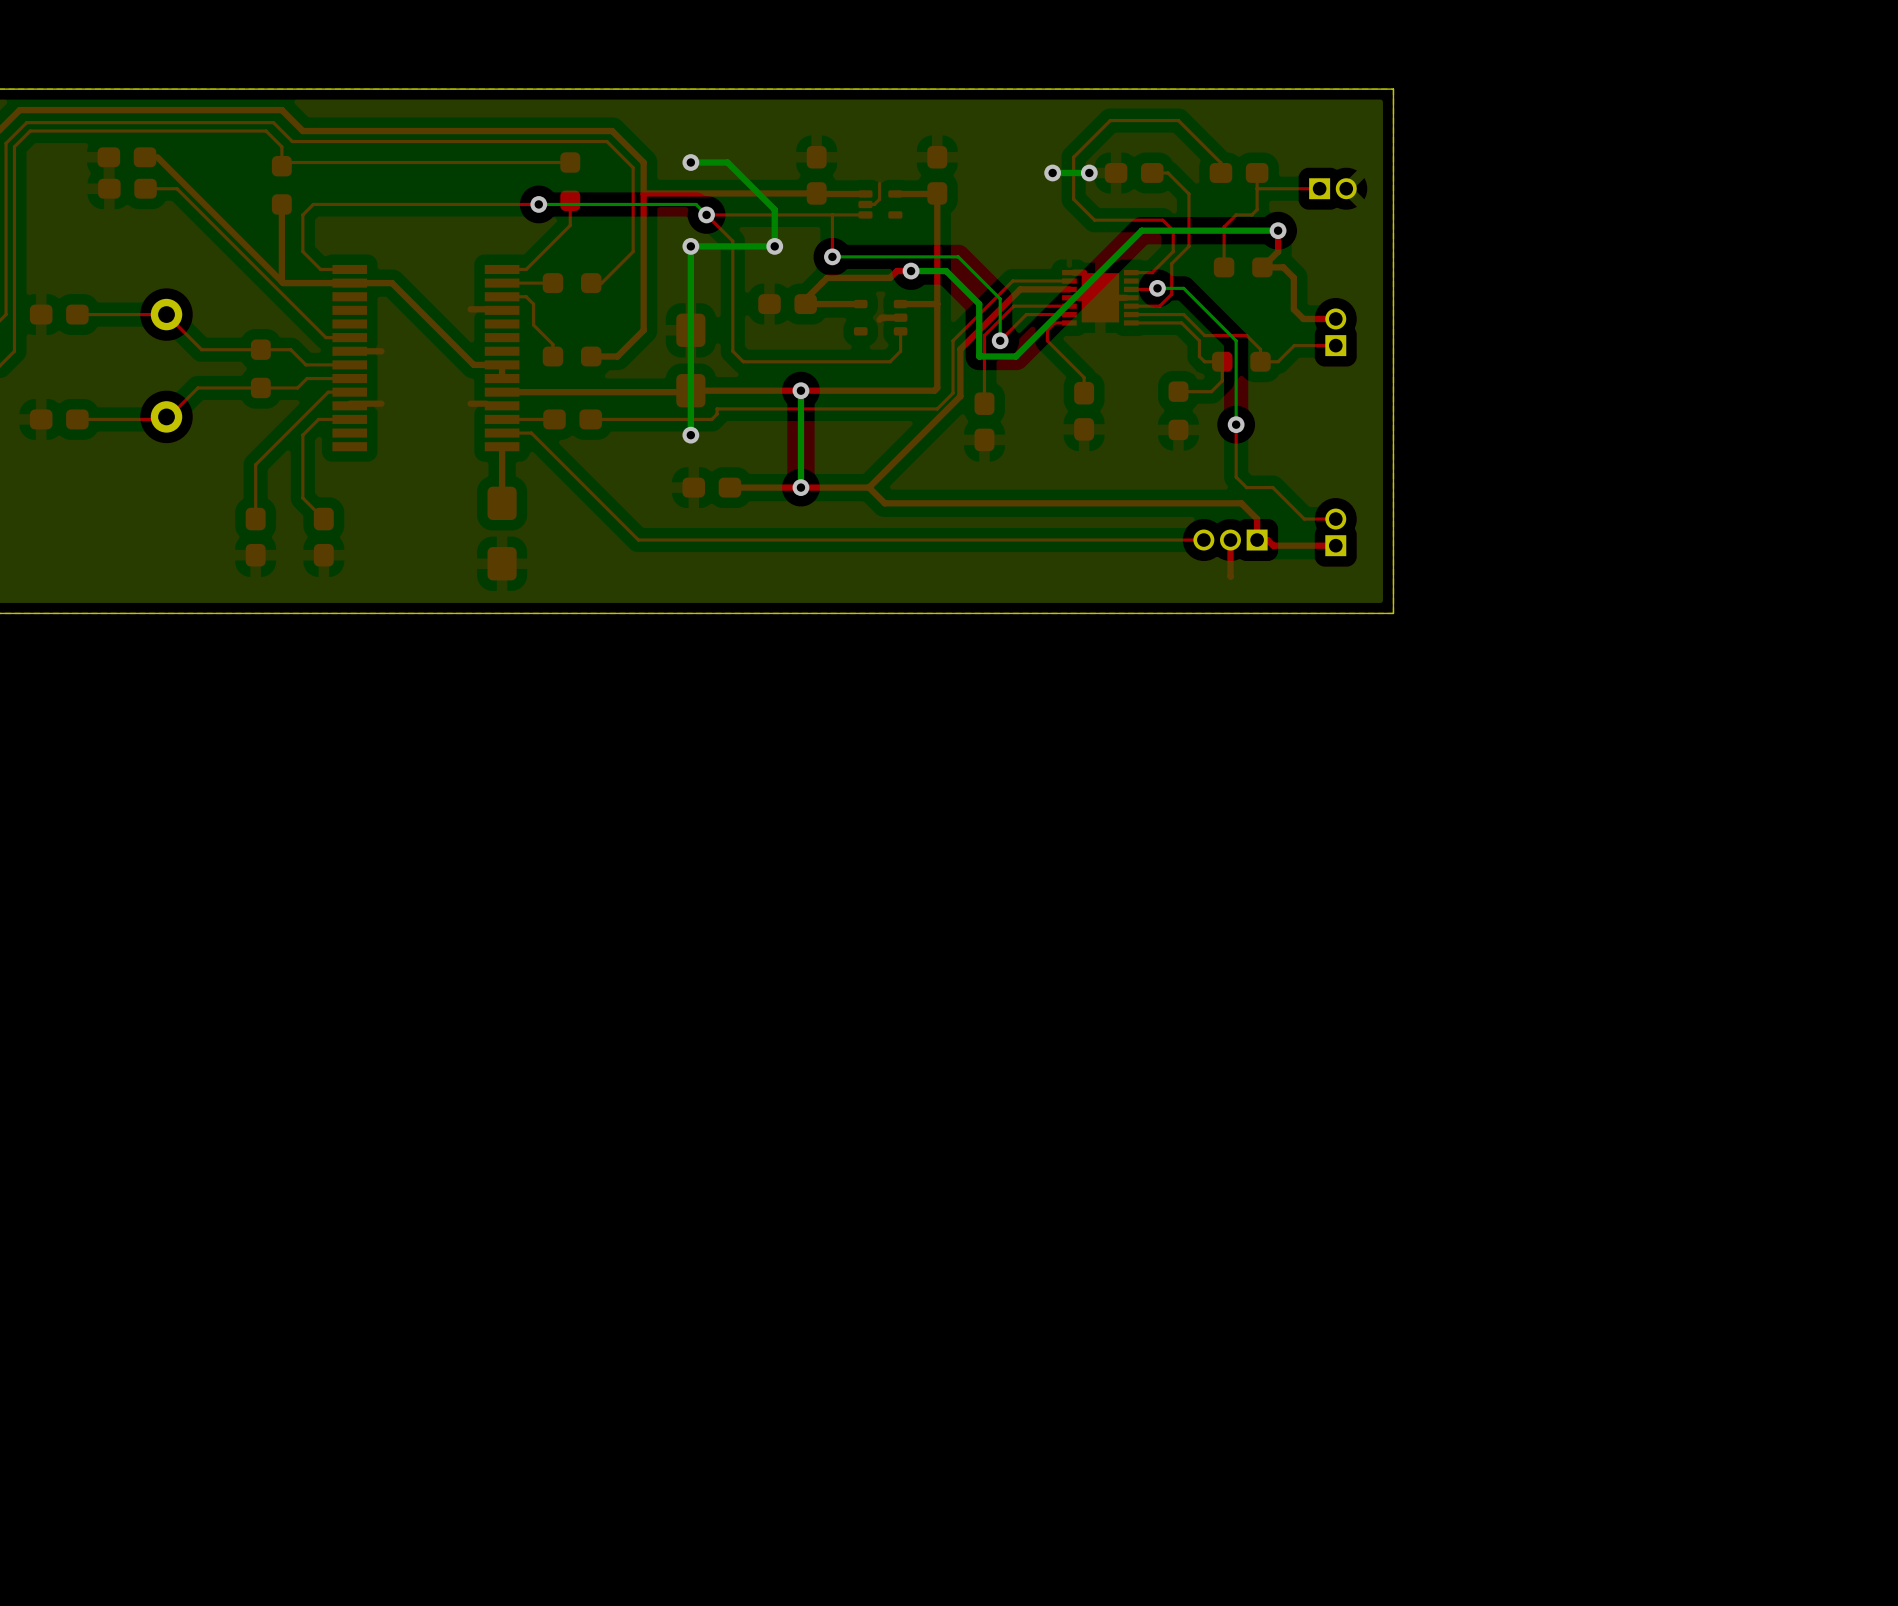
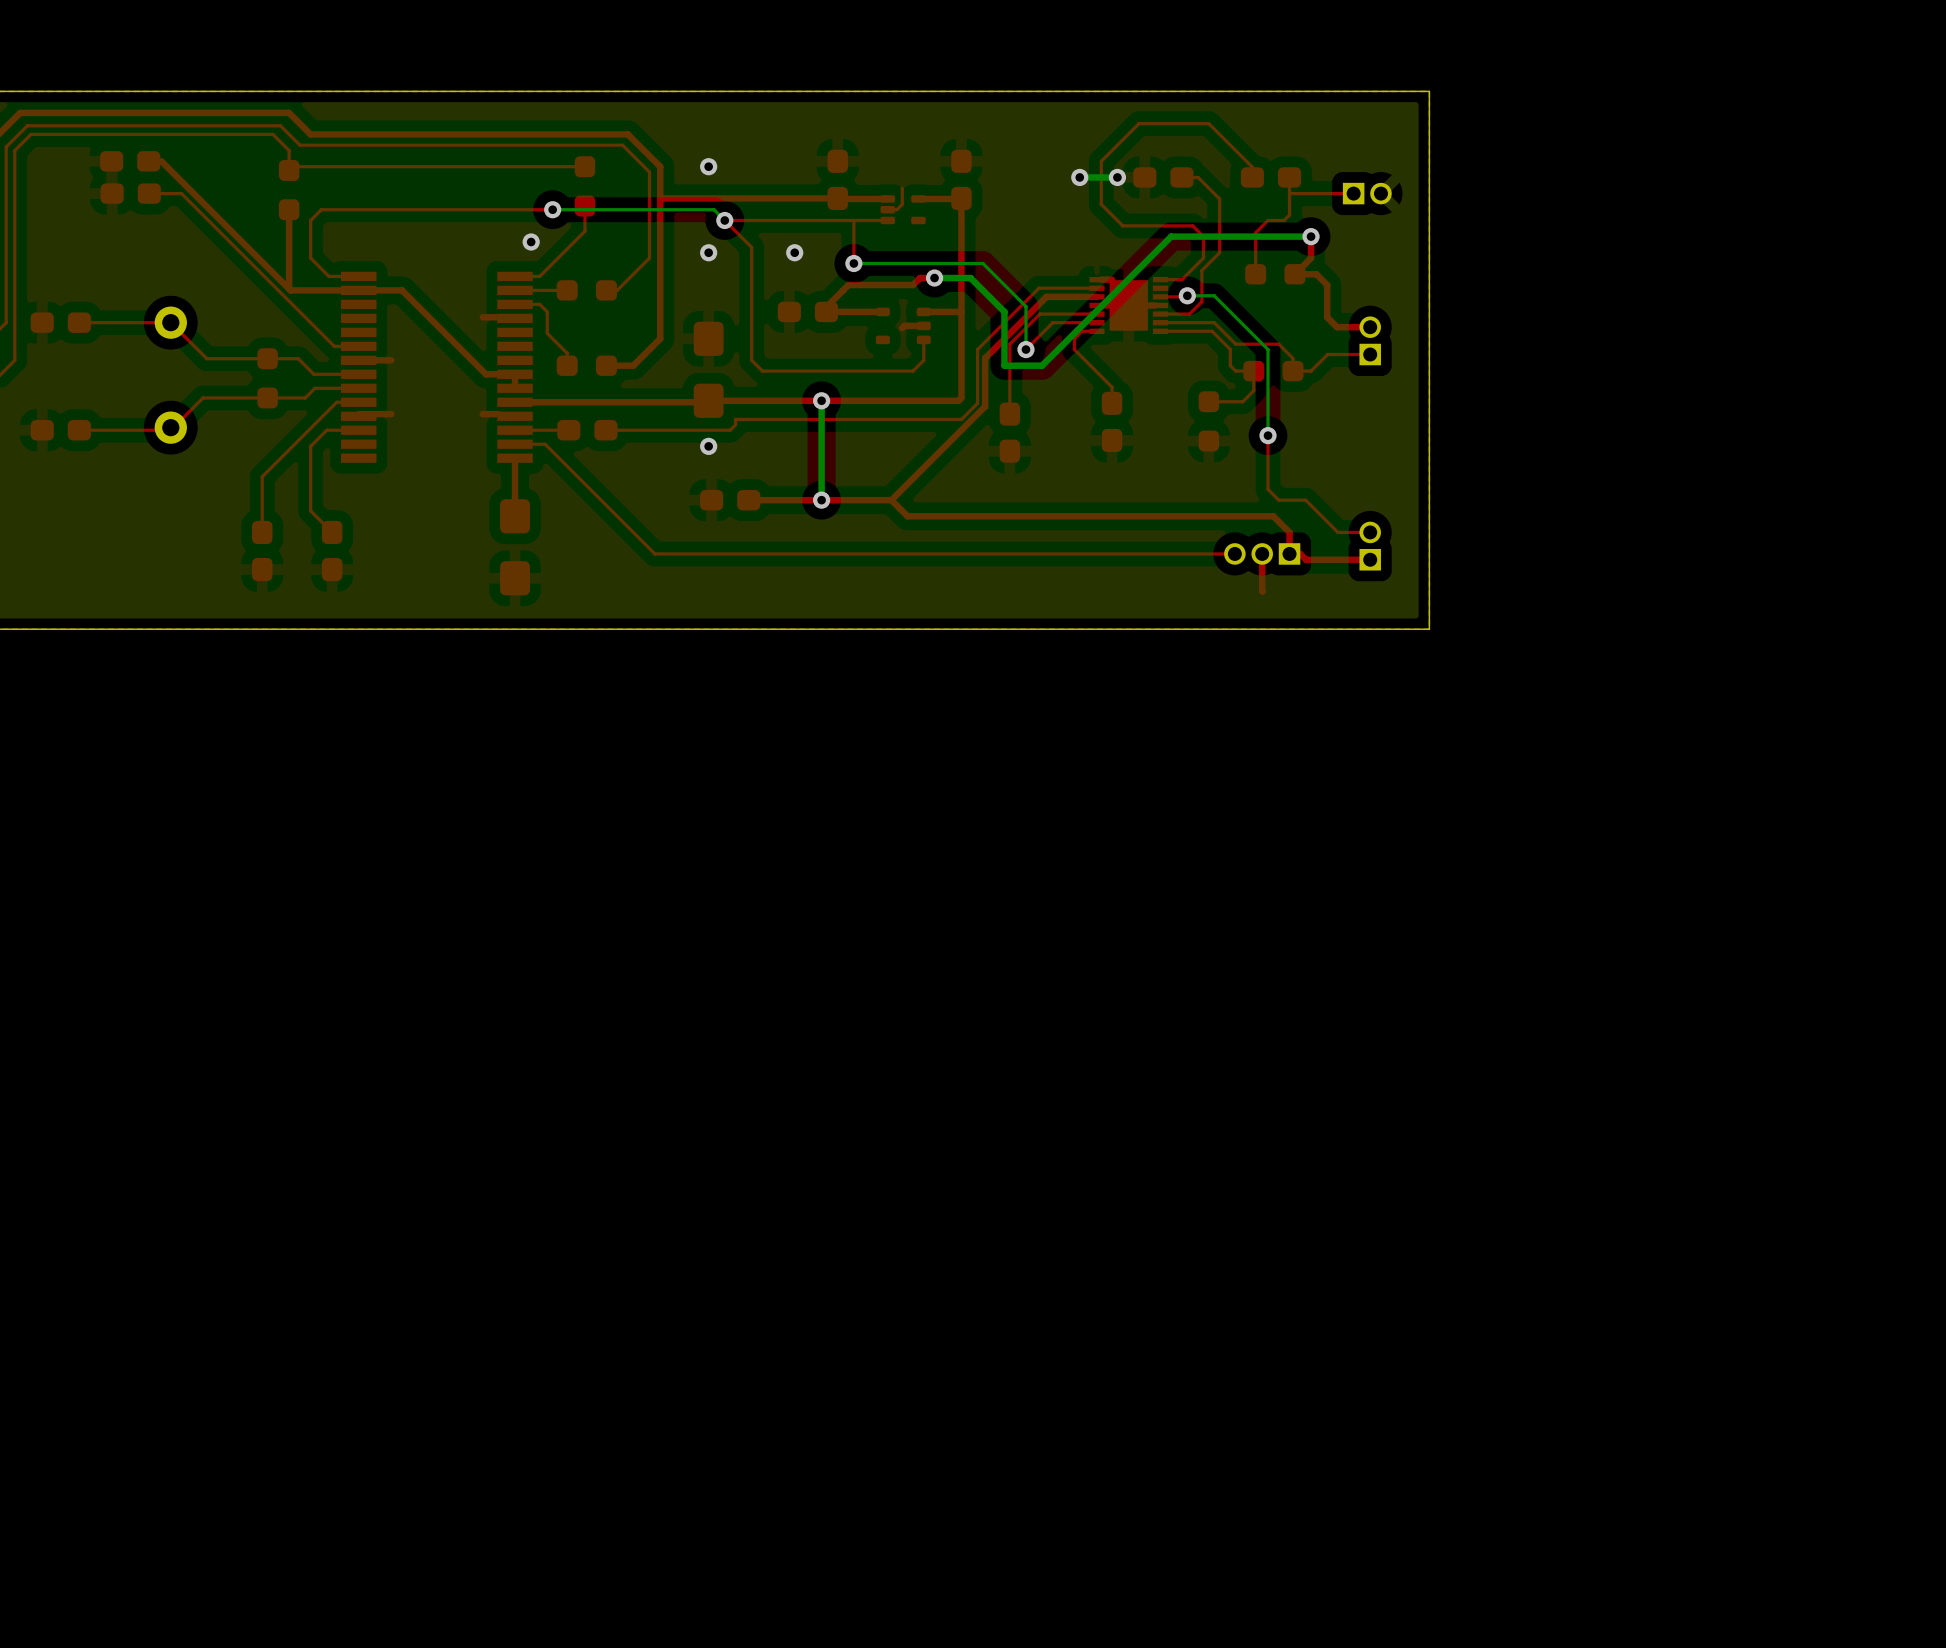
bottom track: (690, 162) (727, 162) (774, 209) (774, 246) (690, 246) (690, 435) -> none
via: none -> (531, 241)

